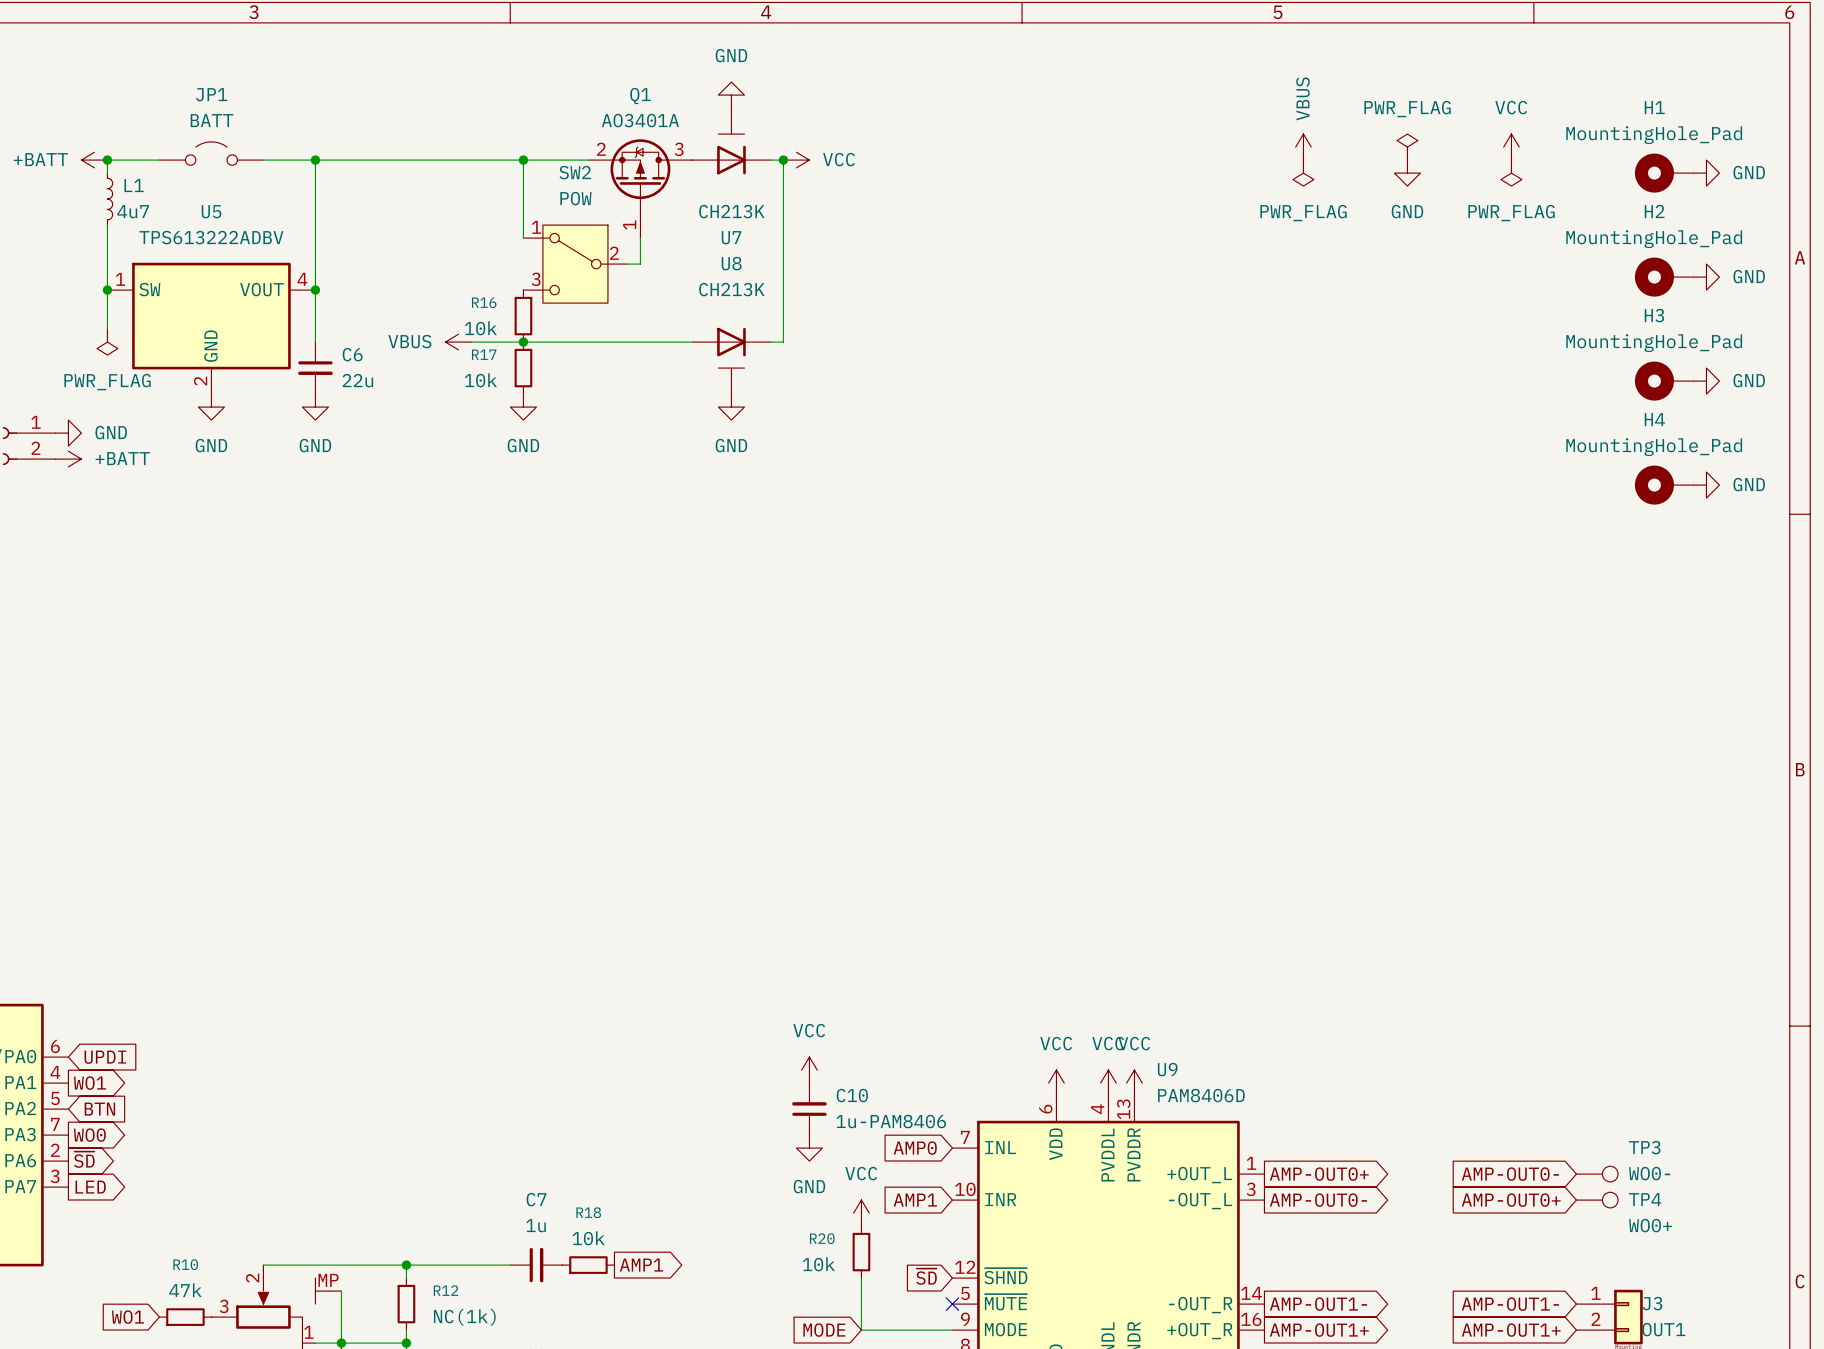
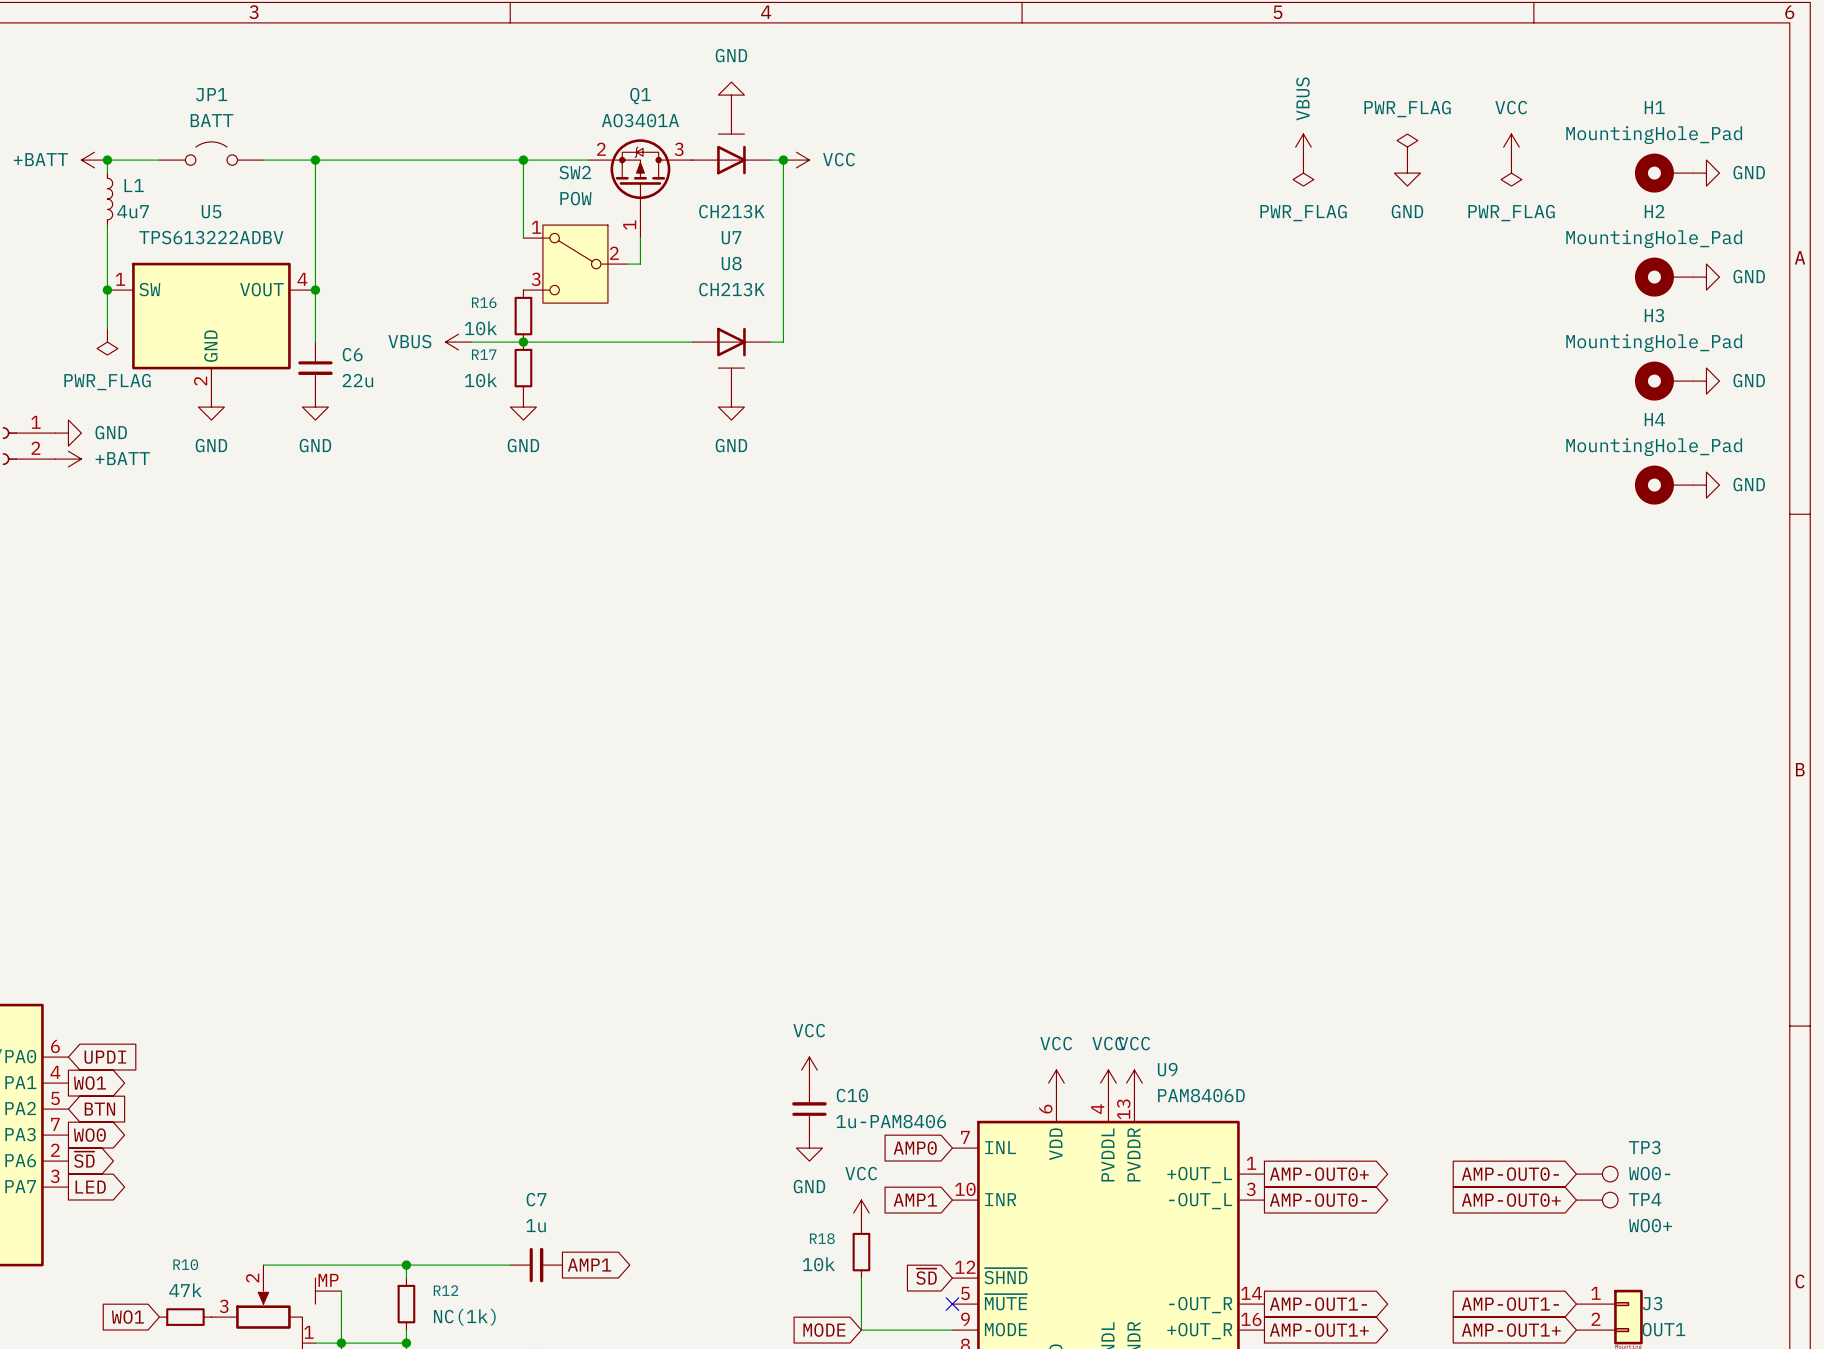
R20 name: R20 (822, 1238) -> R18 (822, 1238)
R18: 10k (588, 1265) -> none
global label position: AMP1 (641, 1265) -> AMP1 (589, 1265)

